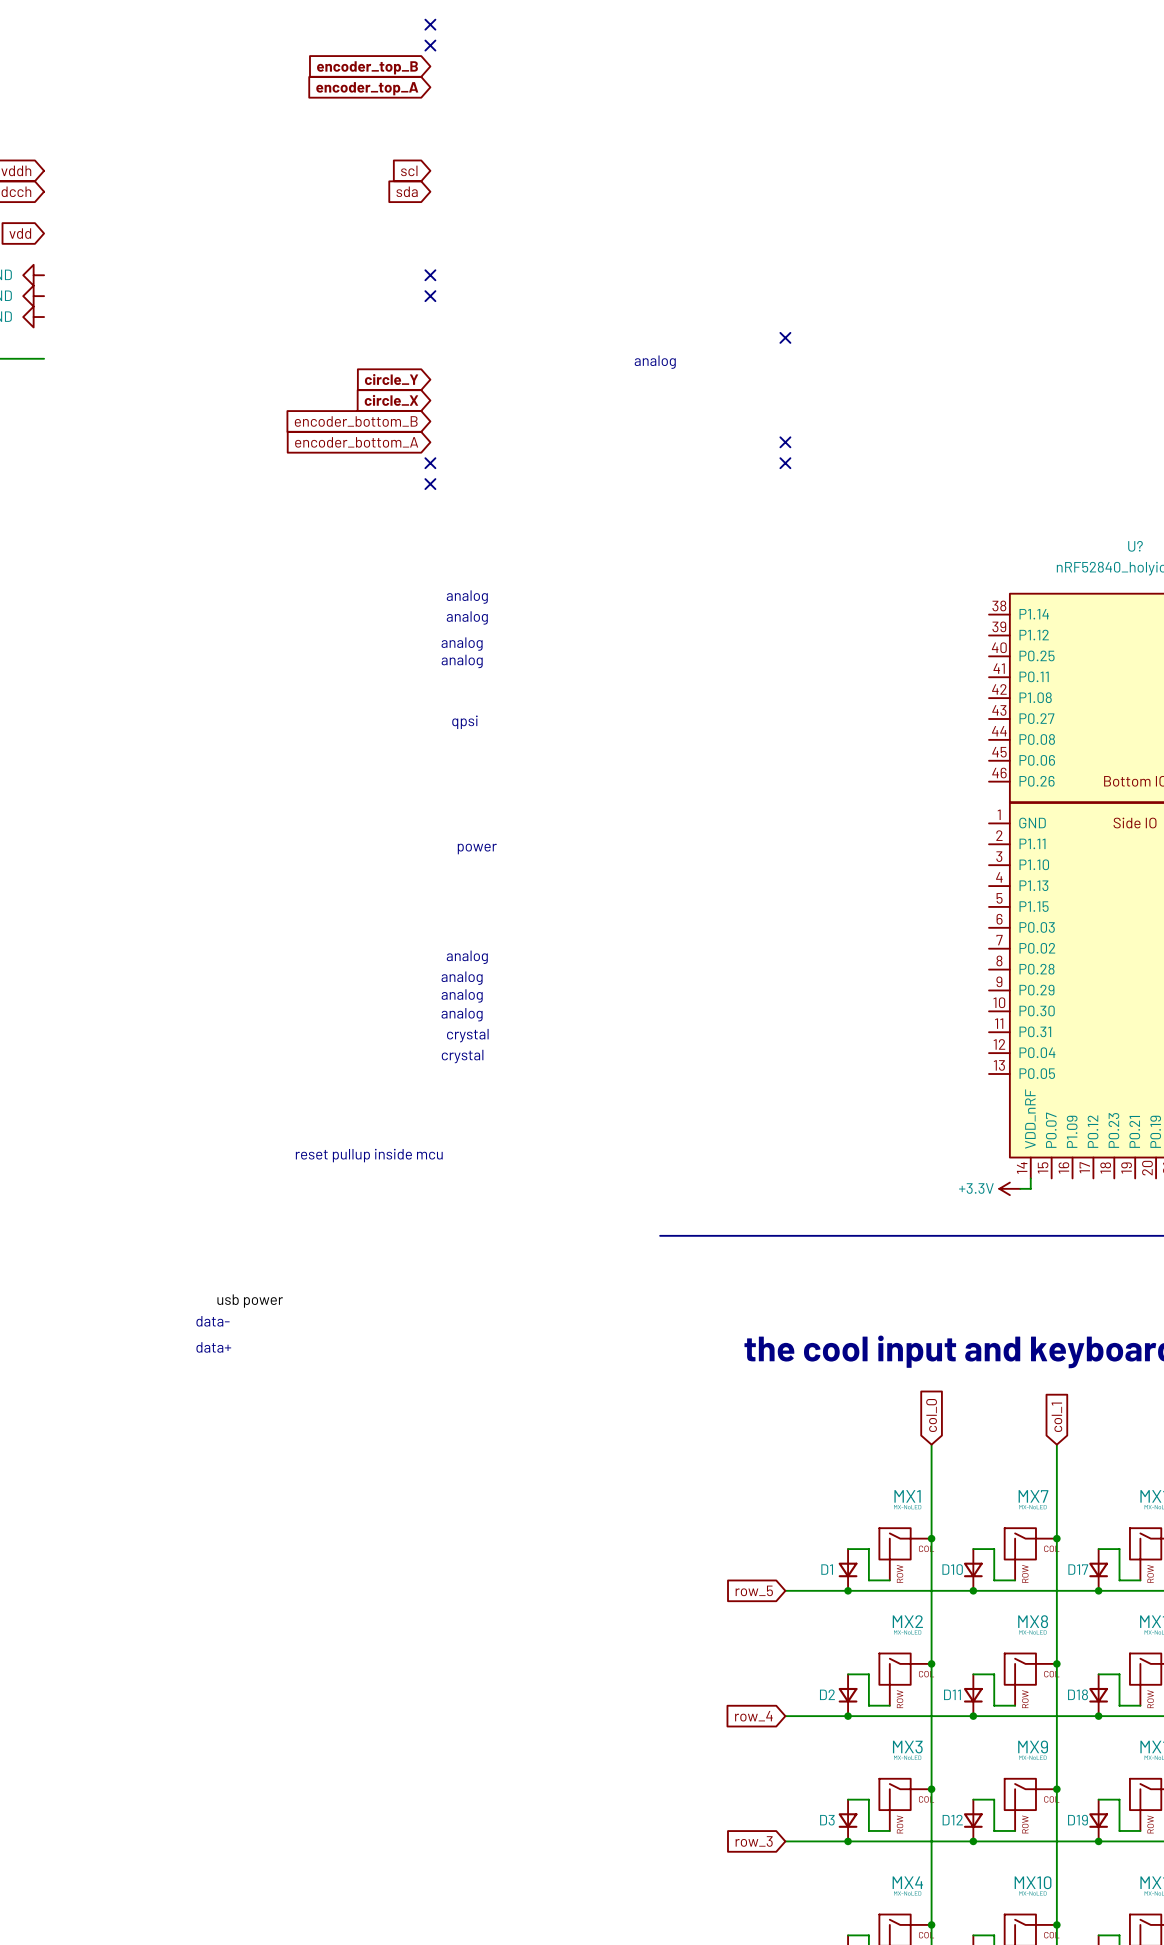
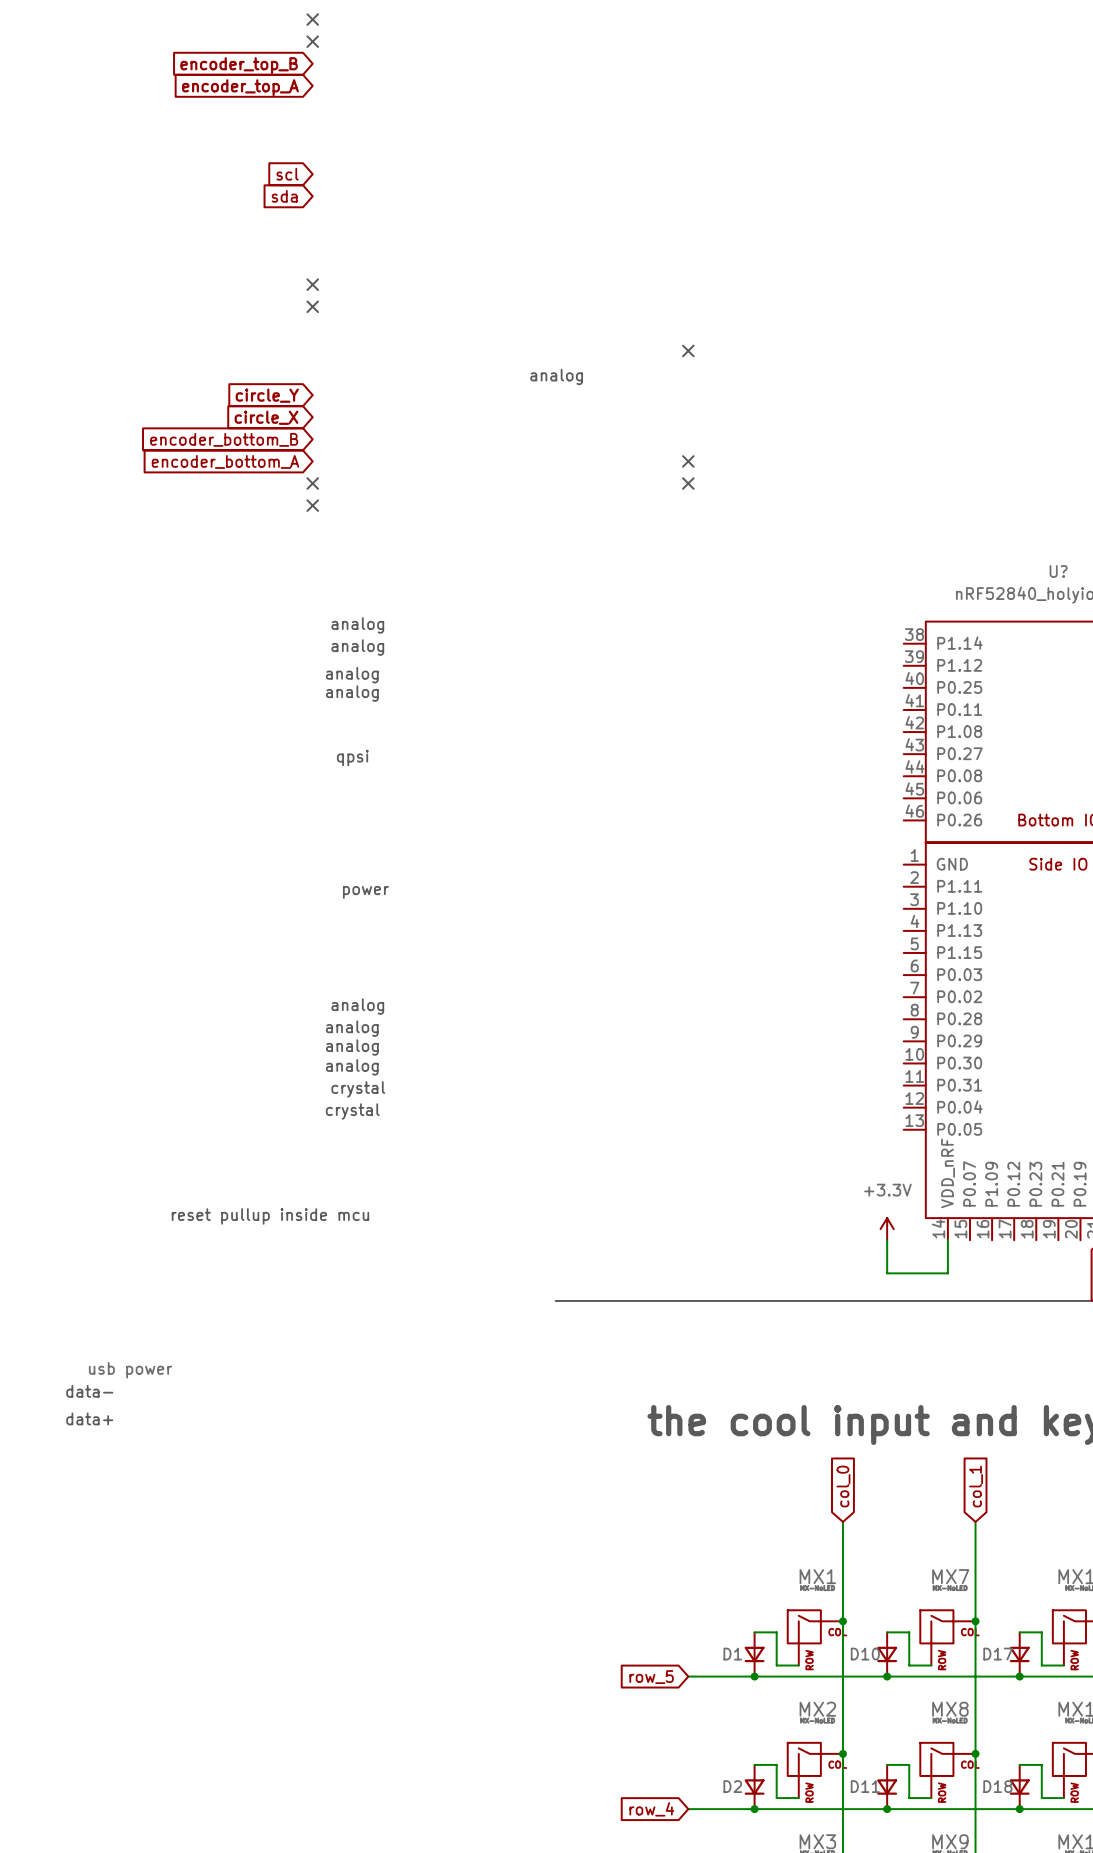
power symbol rotation: 0° (1009, 1188) -> 90° clockwise (887, 1229)
power symbol position: +3.3V (1009, 1188) -> +3.3V (887, 1229)
wire: (1020, 1188) (1030, 1188) -> (887, 1240) (887, 1273) (947, 1273) (947, 1251)

